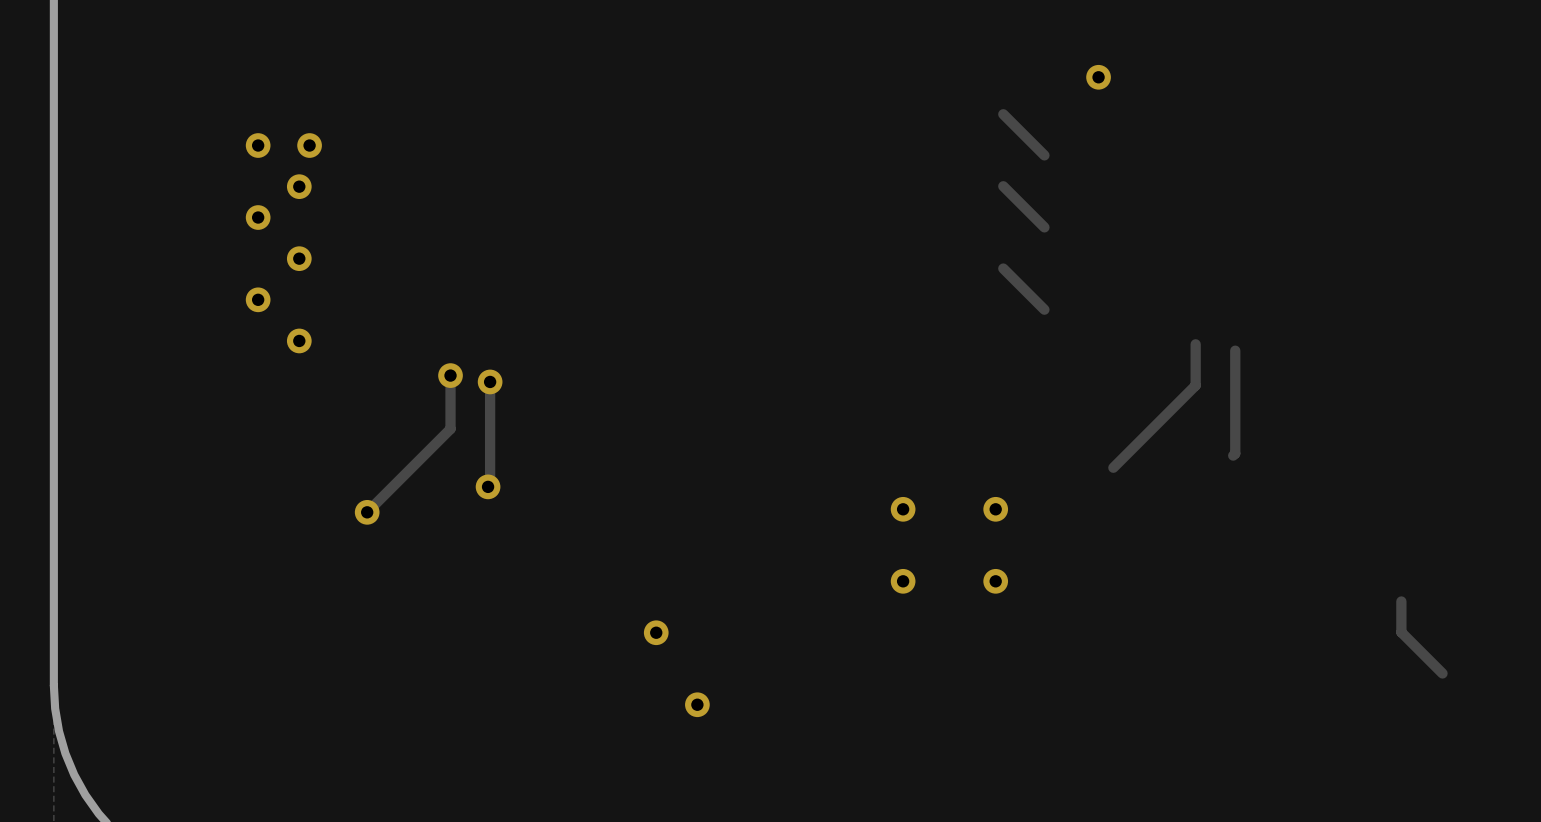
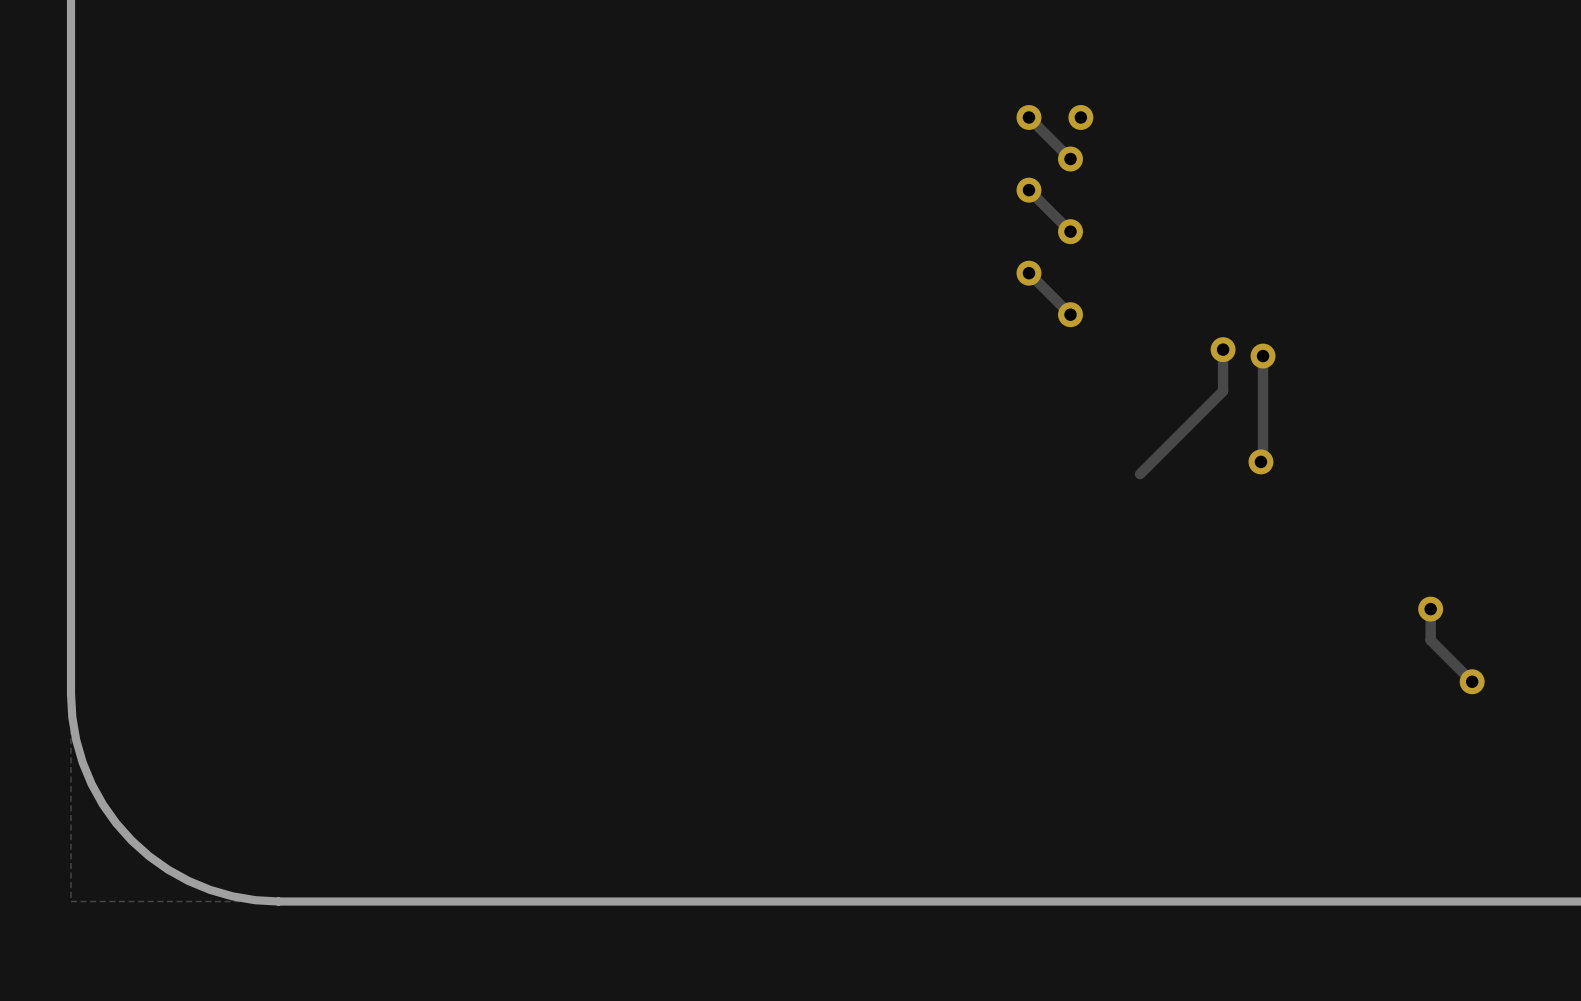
via: (1098, 77) -> none
via: none -> (1028, 117)
via: none -> (1080, 117)
via: (258, 145) -> none
via: (309, 145) -> none
via: none -> (1070, 159)
via: (299, 186) -> none
via: none -> (1028, 190)
via: (258, 217) -> none
via: none -> (1070, 231)
via: (299, 258) -> none
via: none -> (1028, 273)
via: (258, 299) -> none
via: none -> (1070, 314)
via: (299, 340) -> none
via: none -> (1223, 349)
via: none -> (1263, 356)
track: (450, 375) (450, 429) (367, 512) -> none
via: (450, 375) -> none
track: (490, 381) (490, 484) (488, 486) -> none
via: (490, 381) -> none
via: none -> (1260, 461)
via: (488, 486) -> none
via: (903, 509) -> none
via: (995, 509) -> none
via: (367, 512) -> none
via: (903, 581) -> none
via: (995, 581) -> none
via: none -> (1430, 609)
via: (656, 632) -> none
via: none -> (1472, 681)
via: (697, 704) -> none

